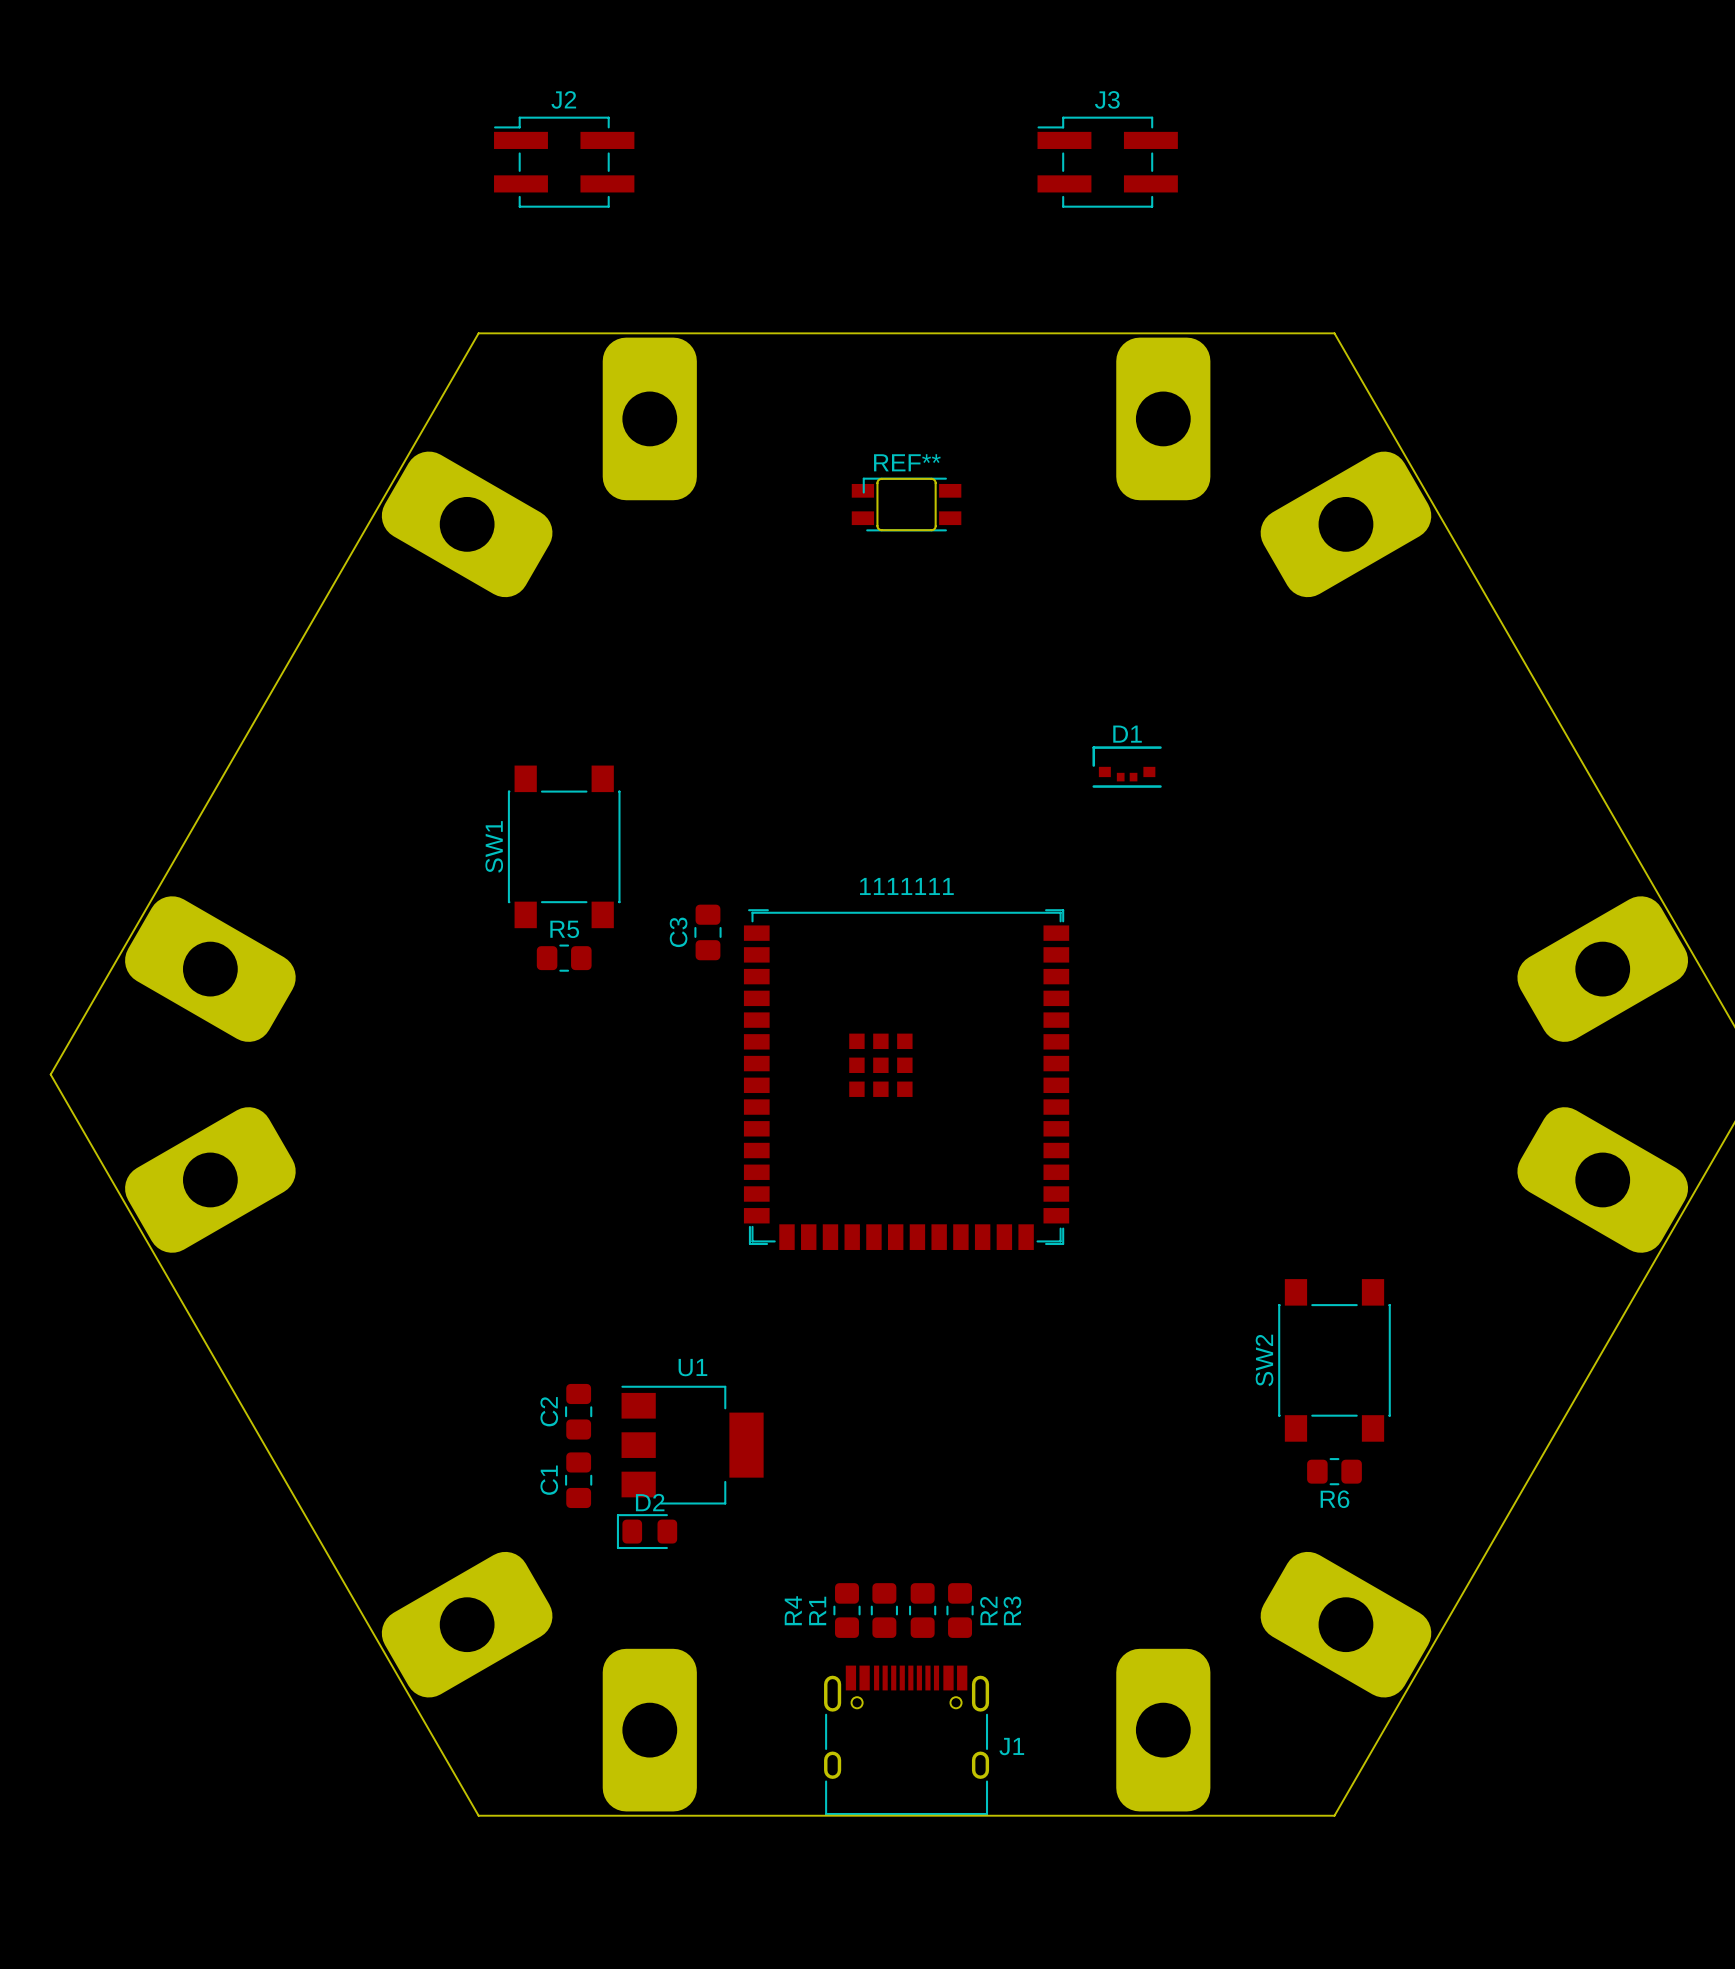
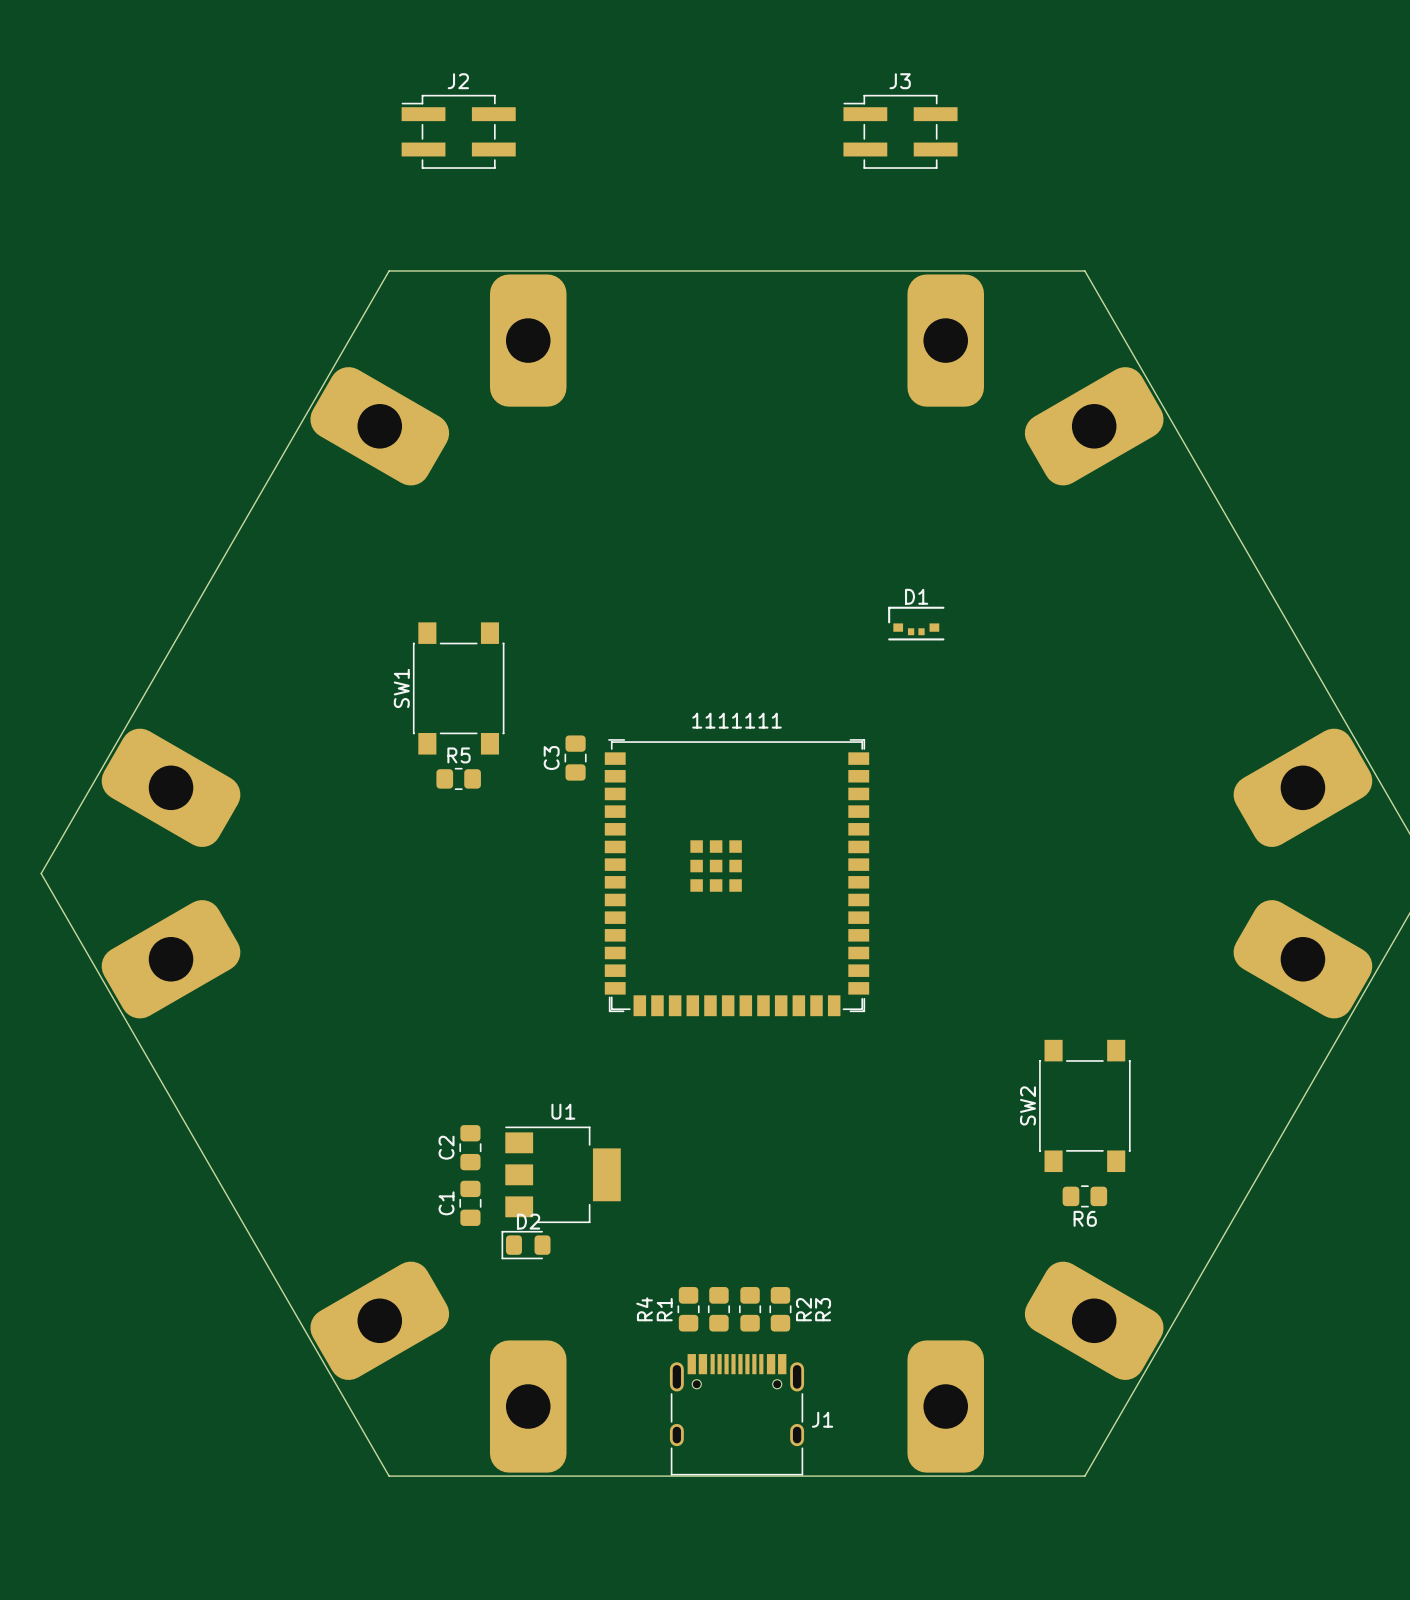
REF**: (906, 504) -> none

